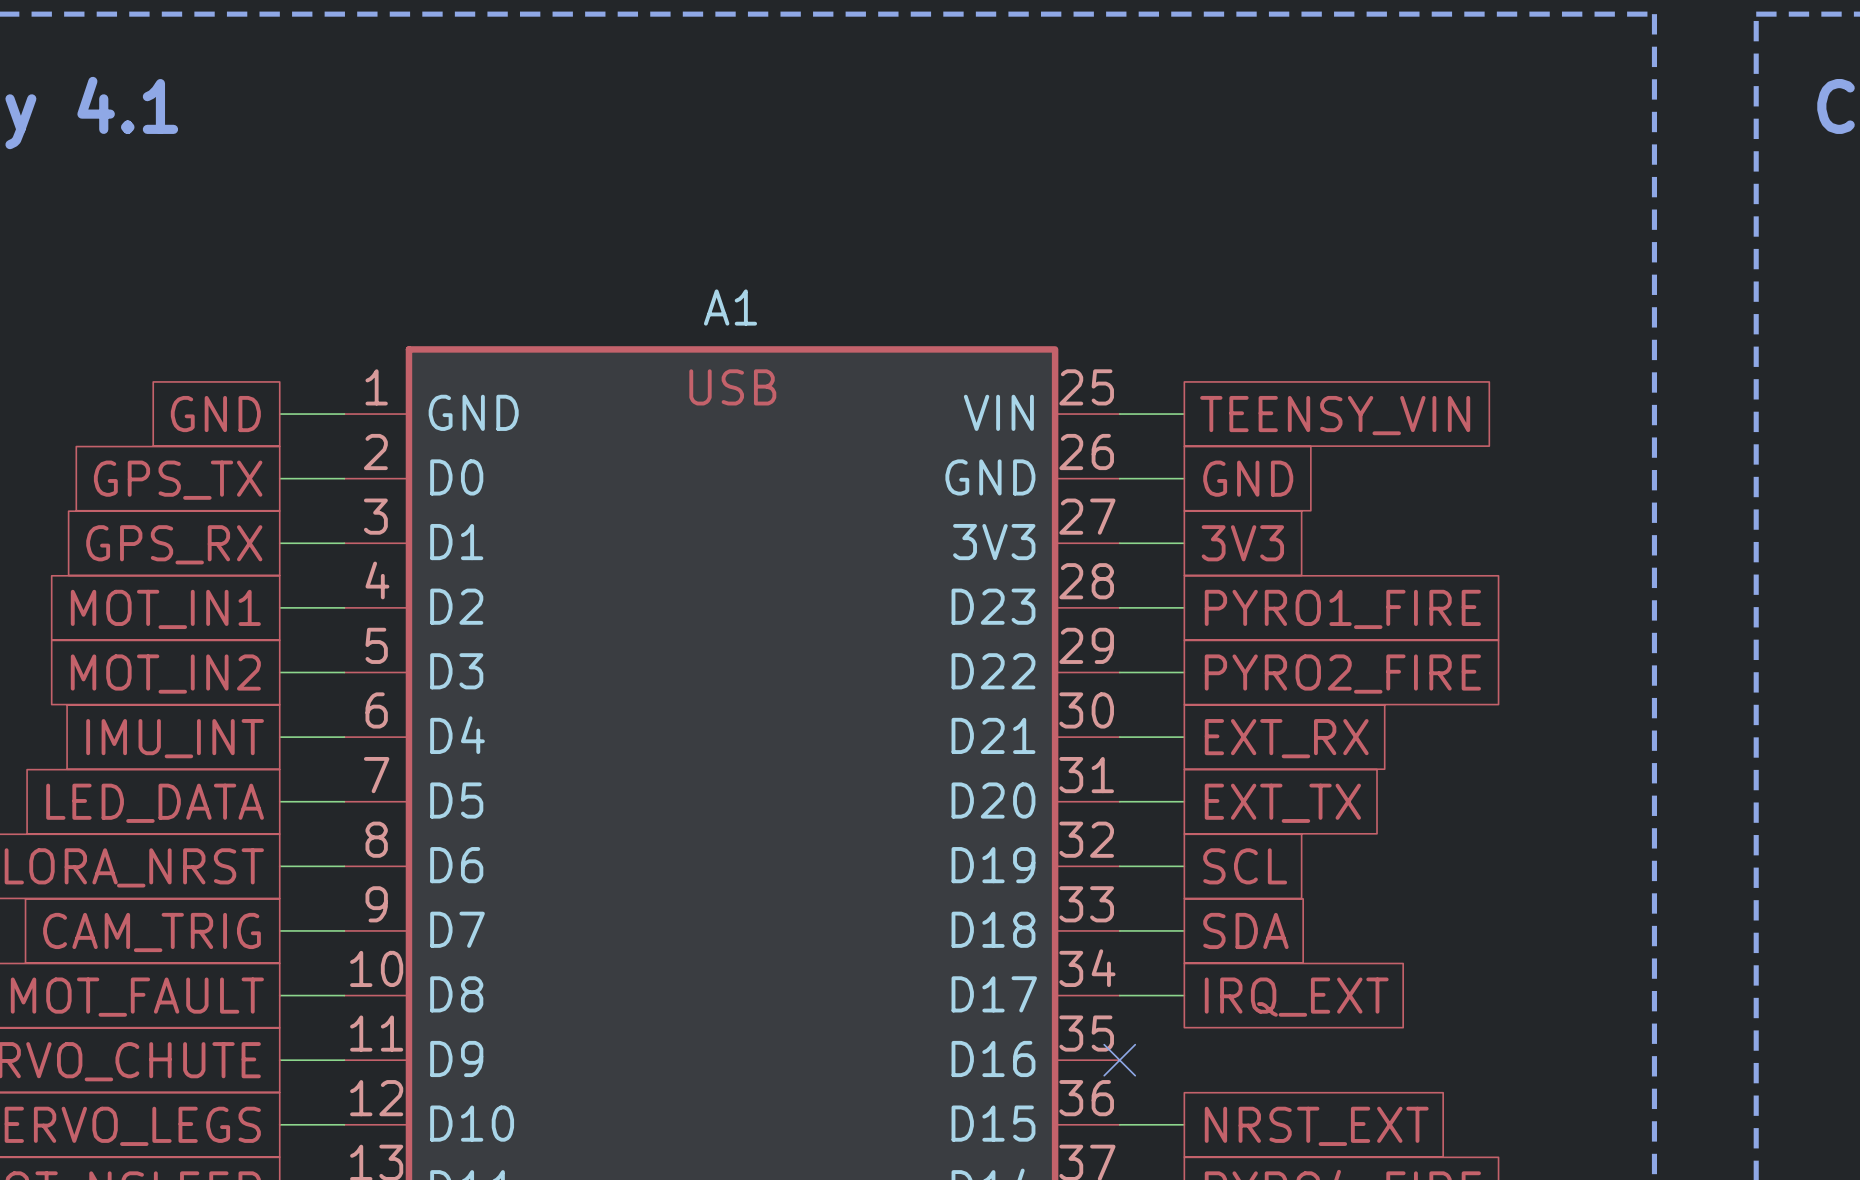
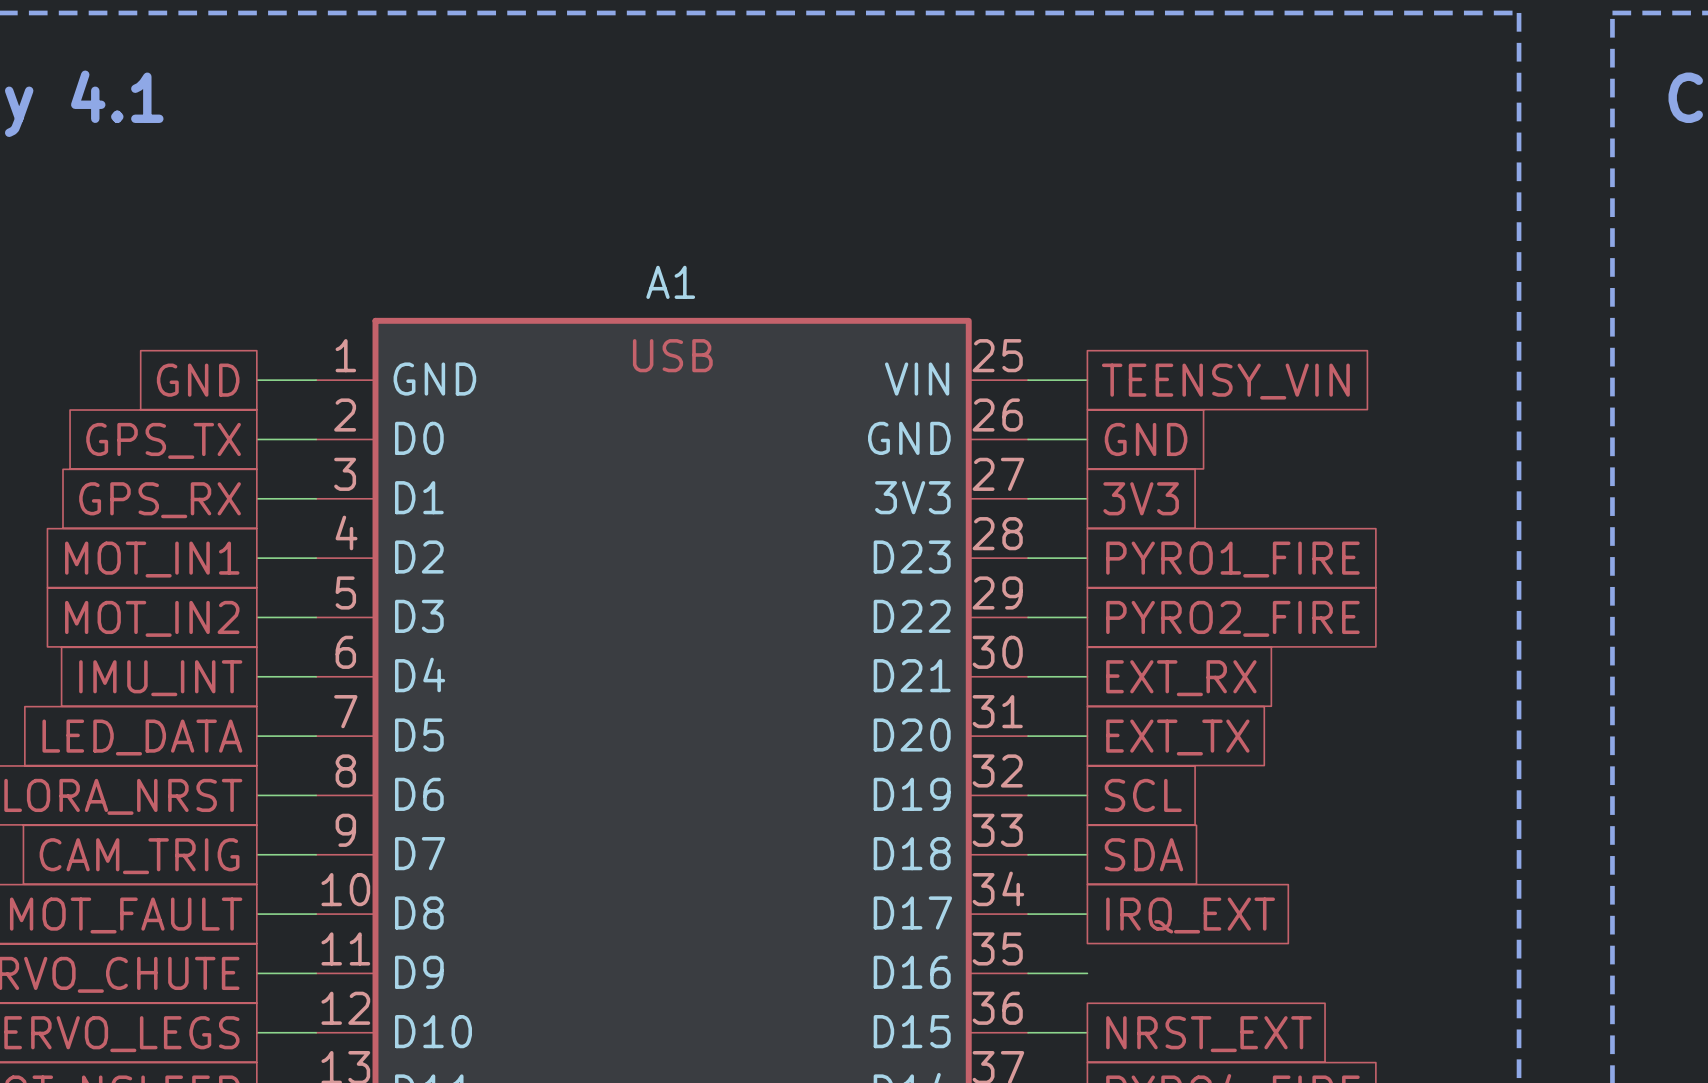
wire: none -> (1028, 973) (1087, 973)
no-connect mark: (1119, 1060) -> none

